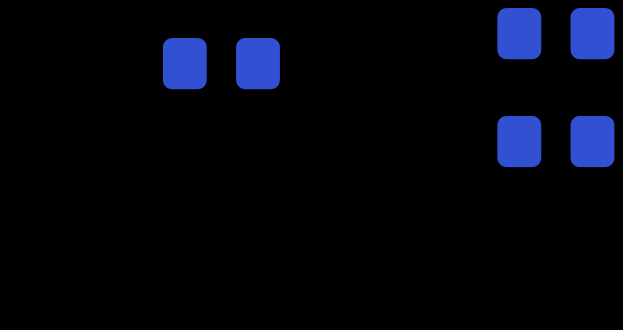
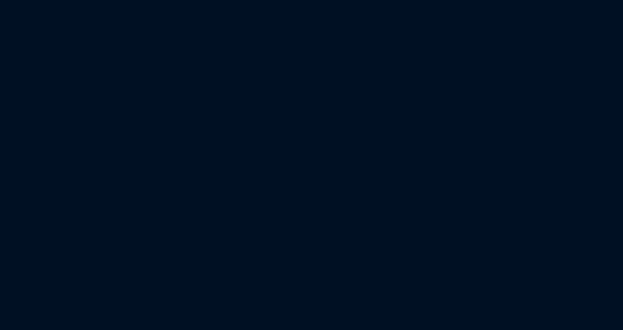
part: (555, 33) -> none
part: (221, 63) -> none
part: (555, 141) -> none

